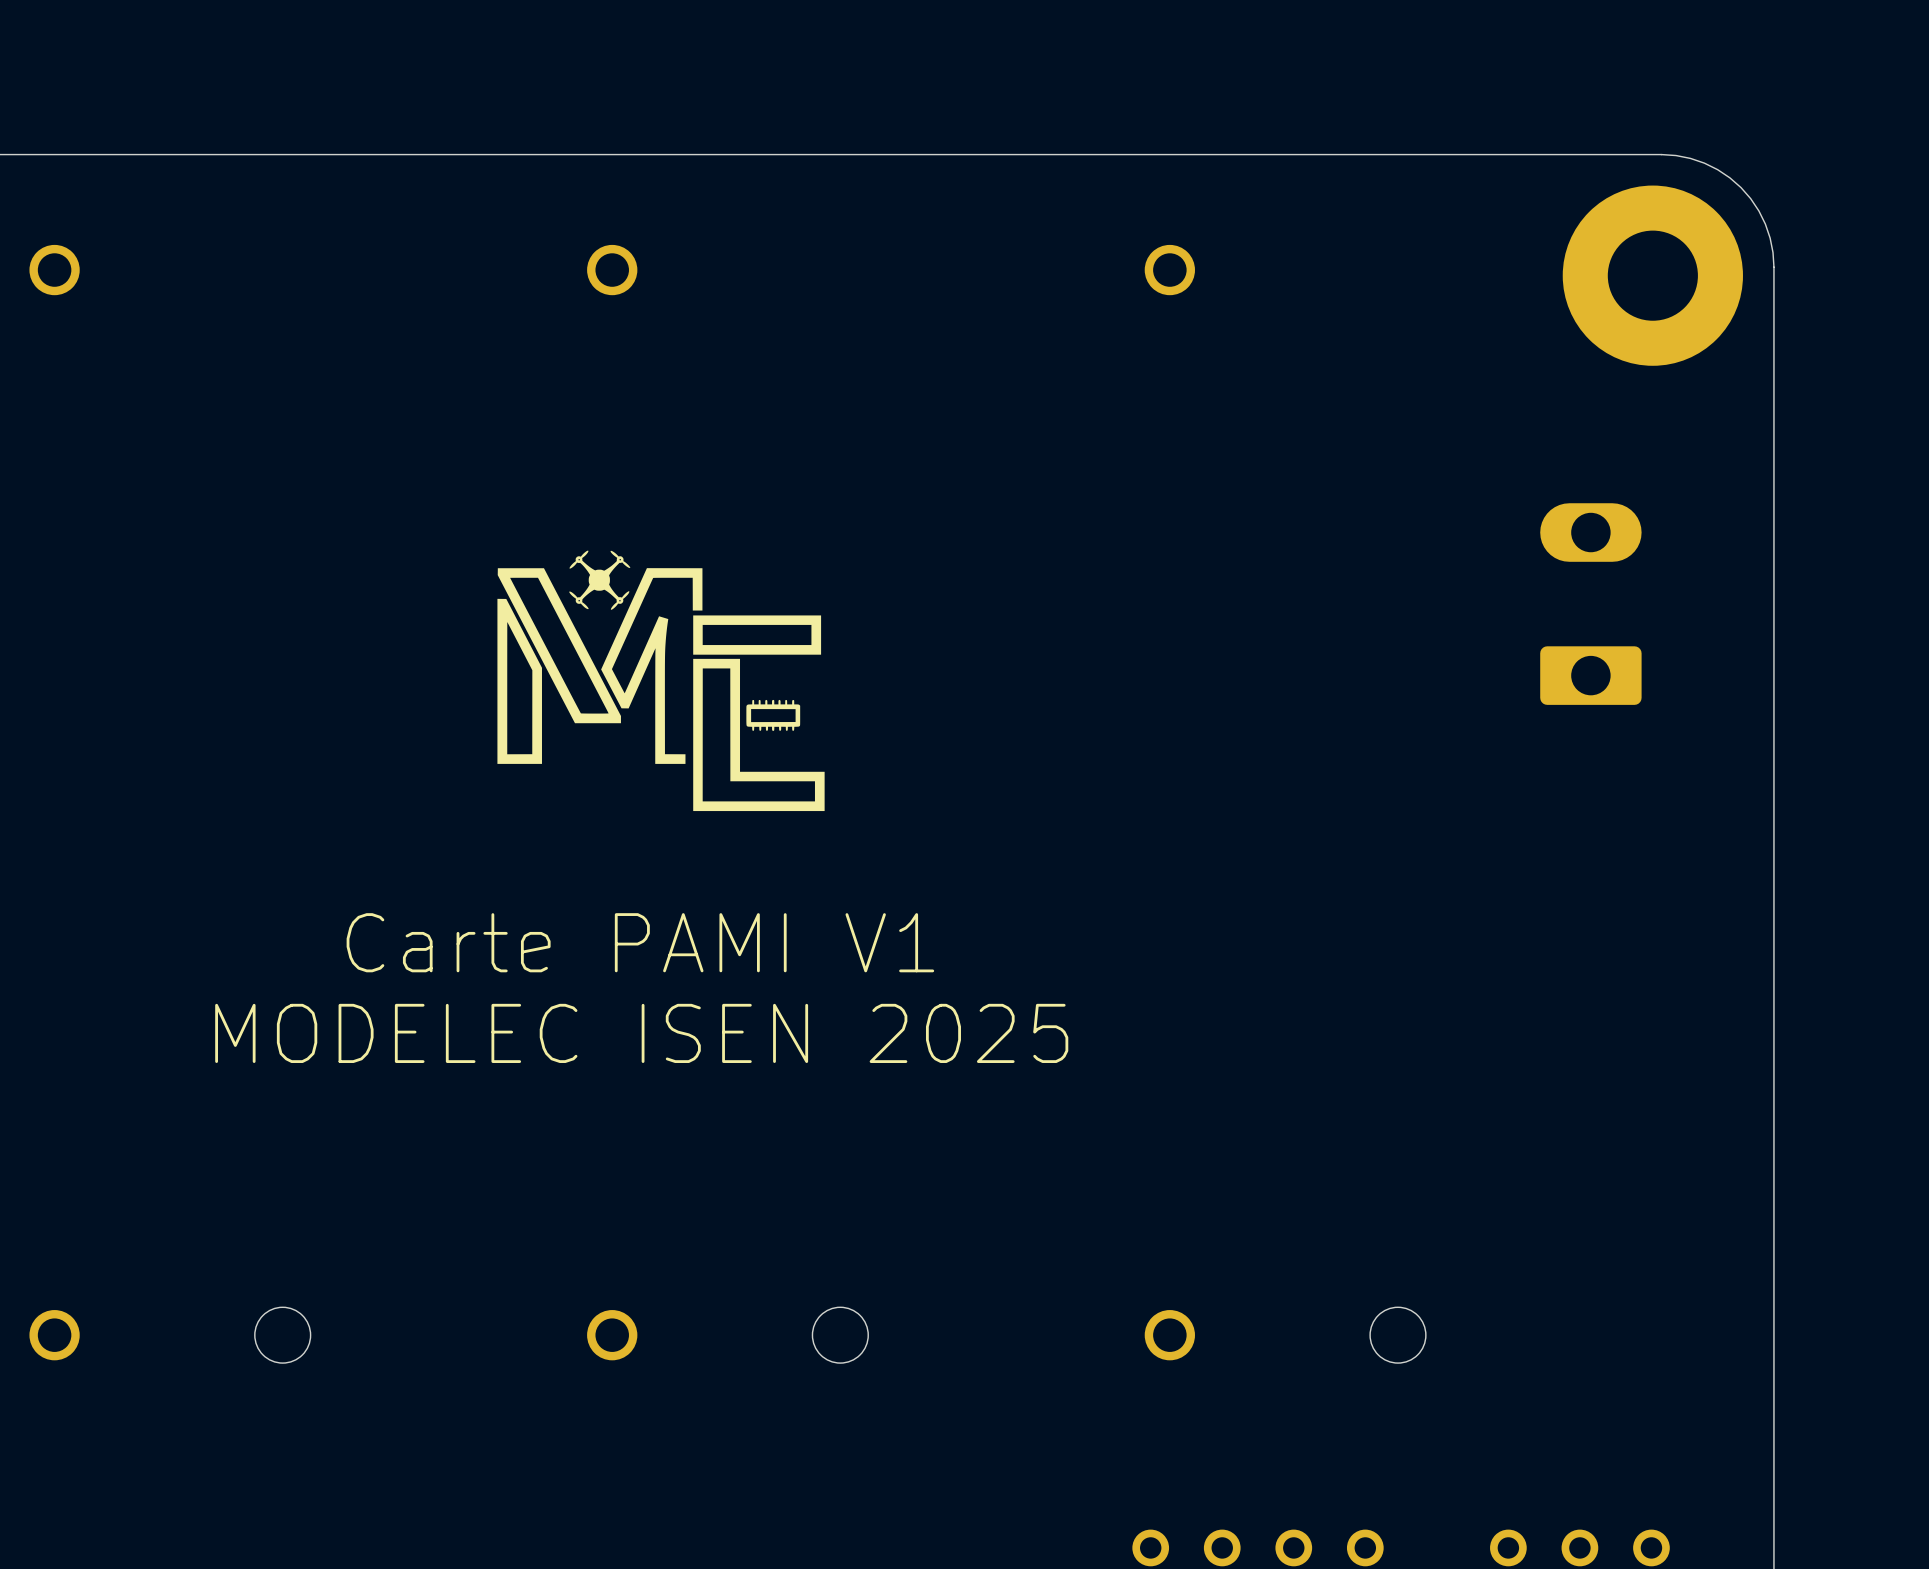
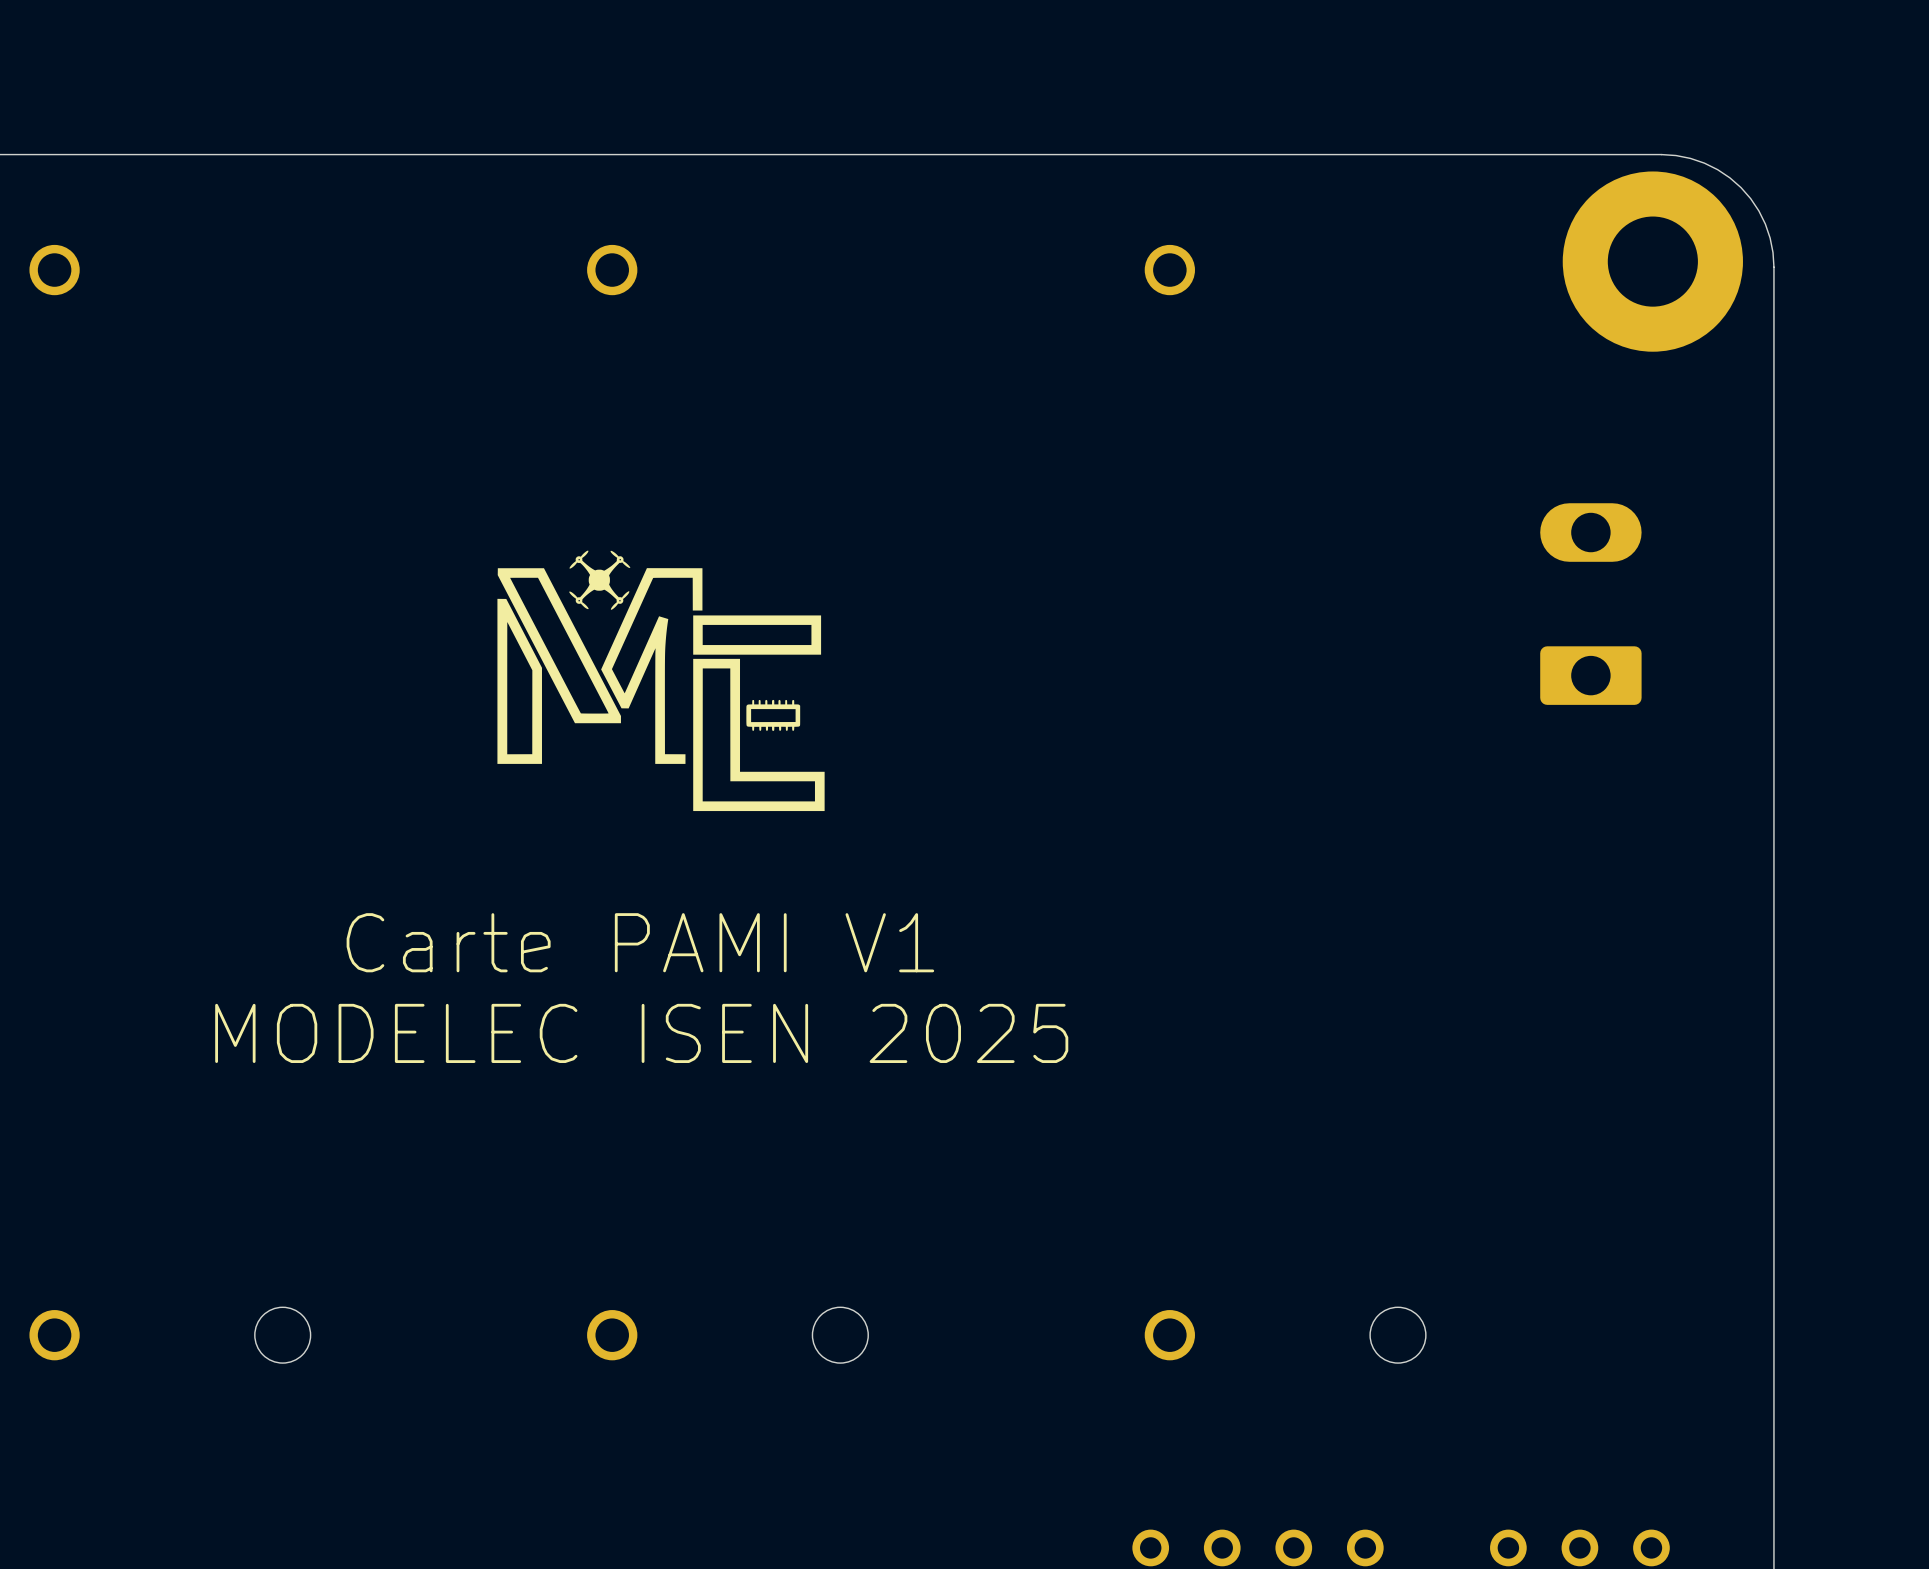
part position: (1652, 275) -> (1652, 261)

